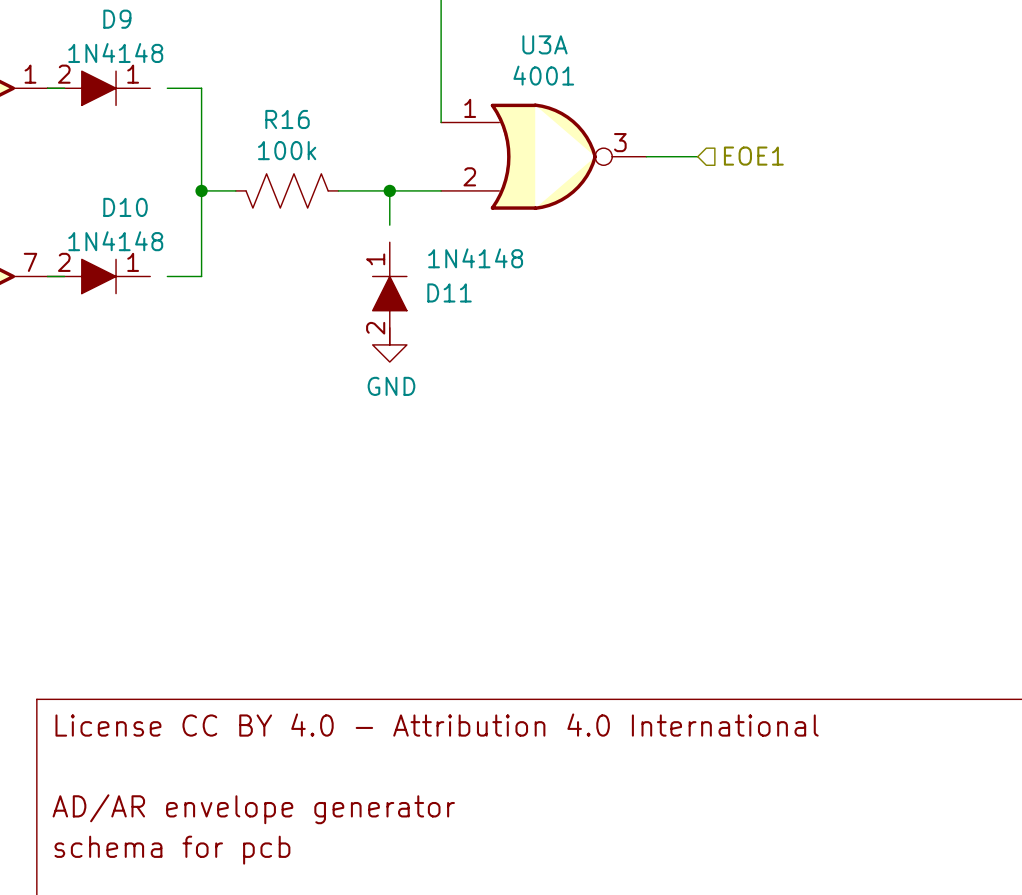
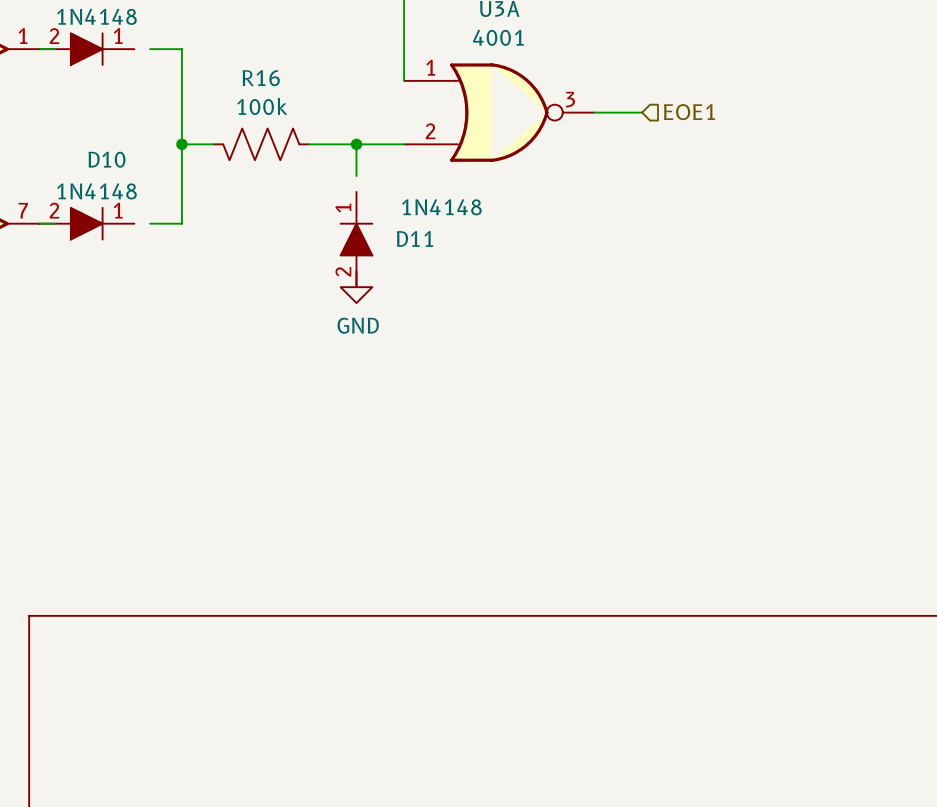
title block: License CC BY 4.0 - Attribution 4.0 International (437, 725) -> none
title block: AD/AR envelope generator (253, 809) -> none
title block: schema for pcb (172, 850) -> none

